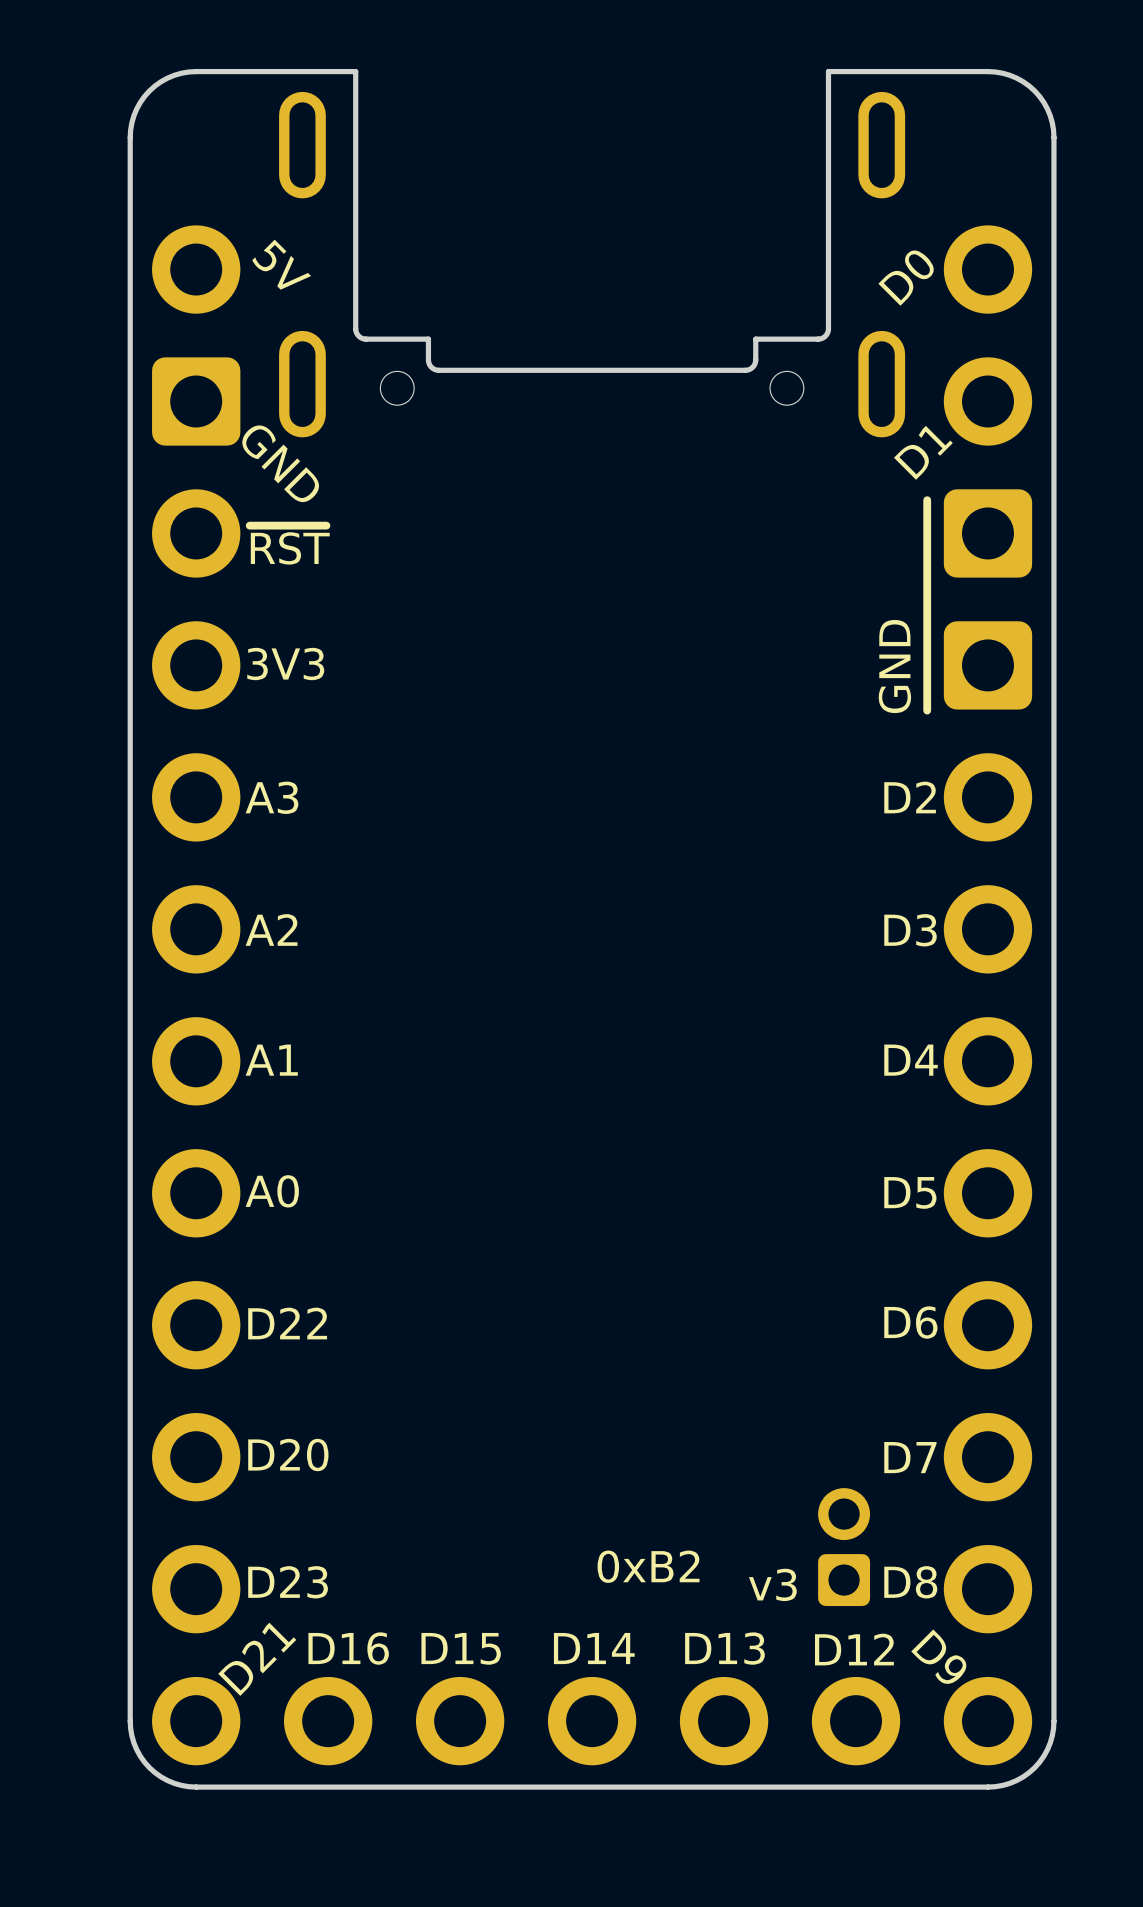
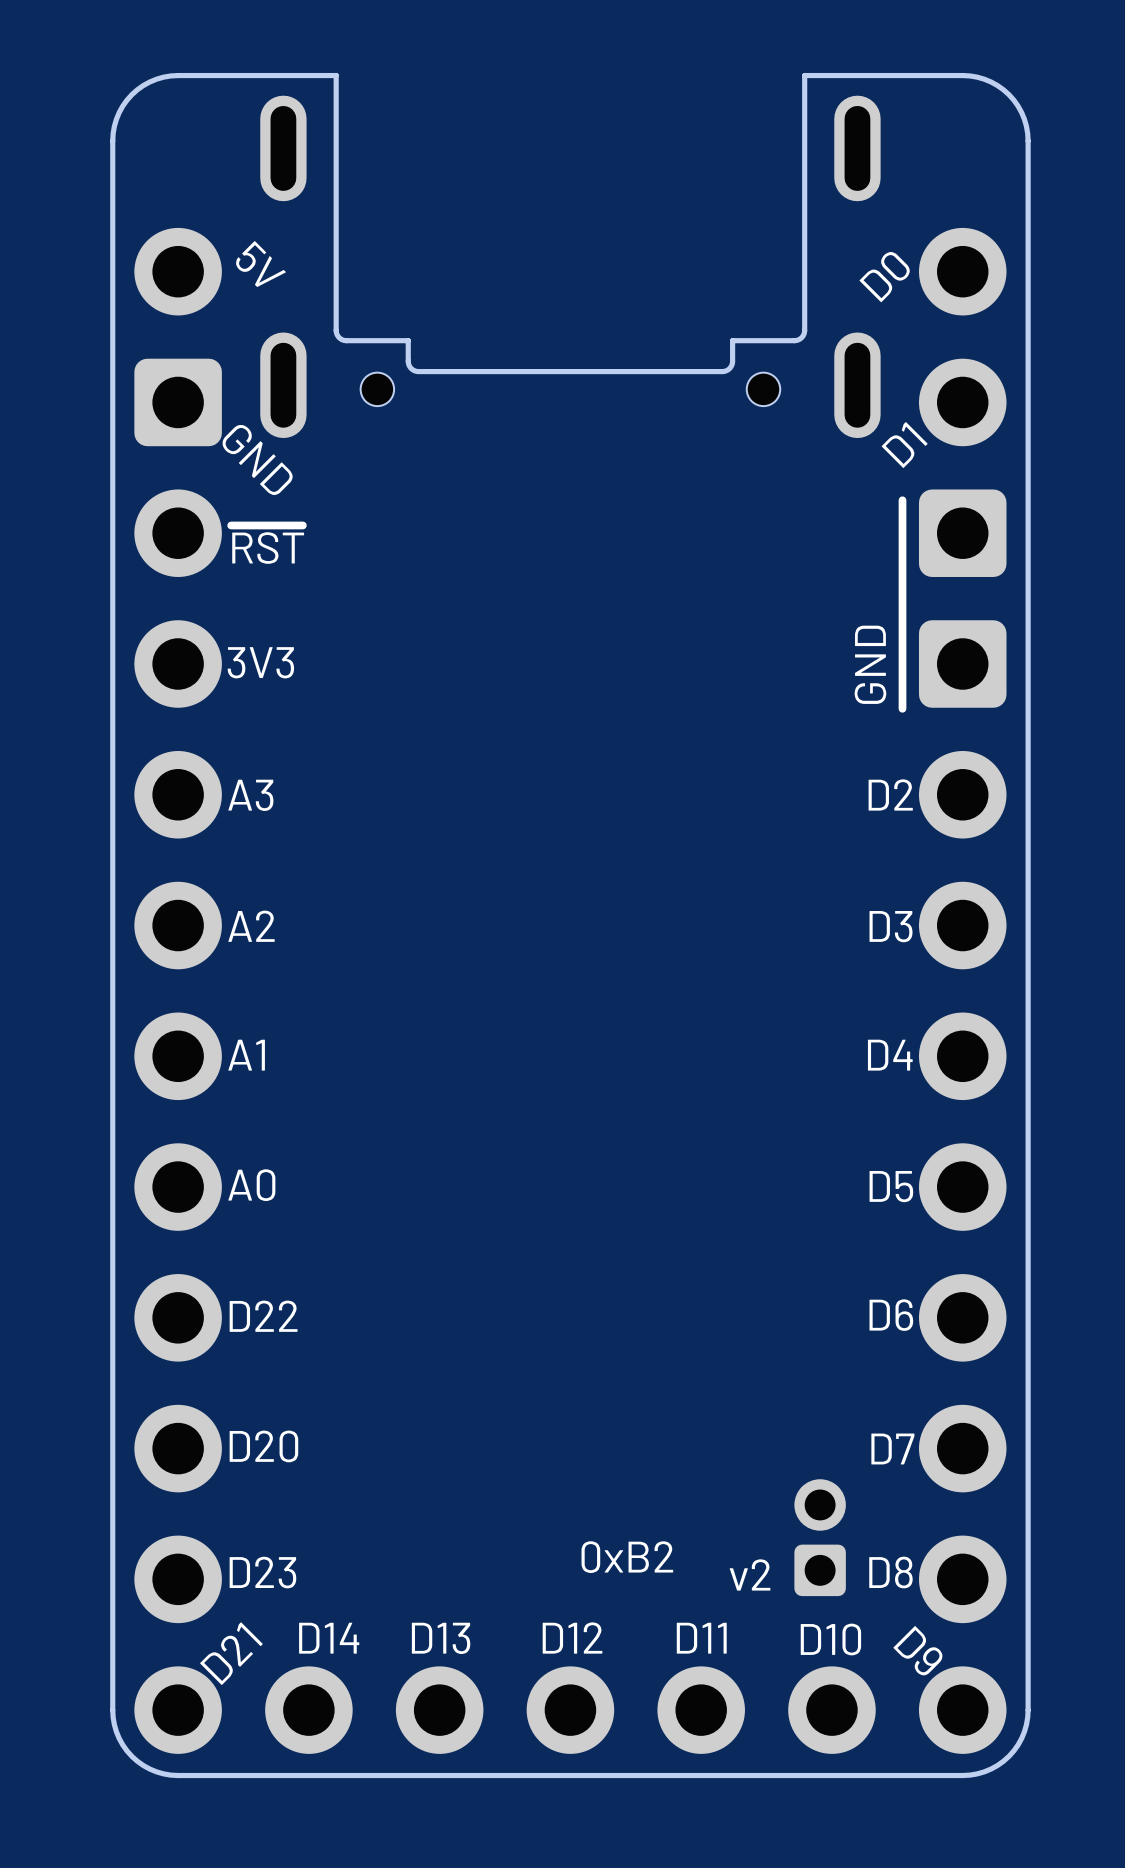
text: v3 (772, 1584) -> v2 (750, 1574)
part text: D16 (348, 1648) -> D14 (329, 1638)
part text: D15 (461, 1648) -> D13 (441, 1638)
part text: D14 (594, 1648) -> D12 (572, 1638)
part text: D13 (724, 1648) -> D11 (701, 1638)
part text: D12 (854, 1649) -> D10 (830, 1639)

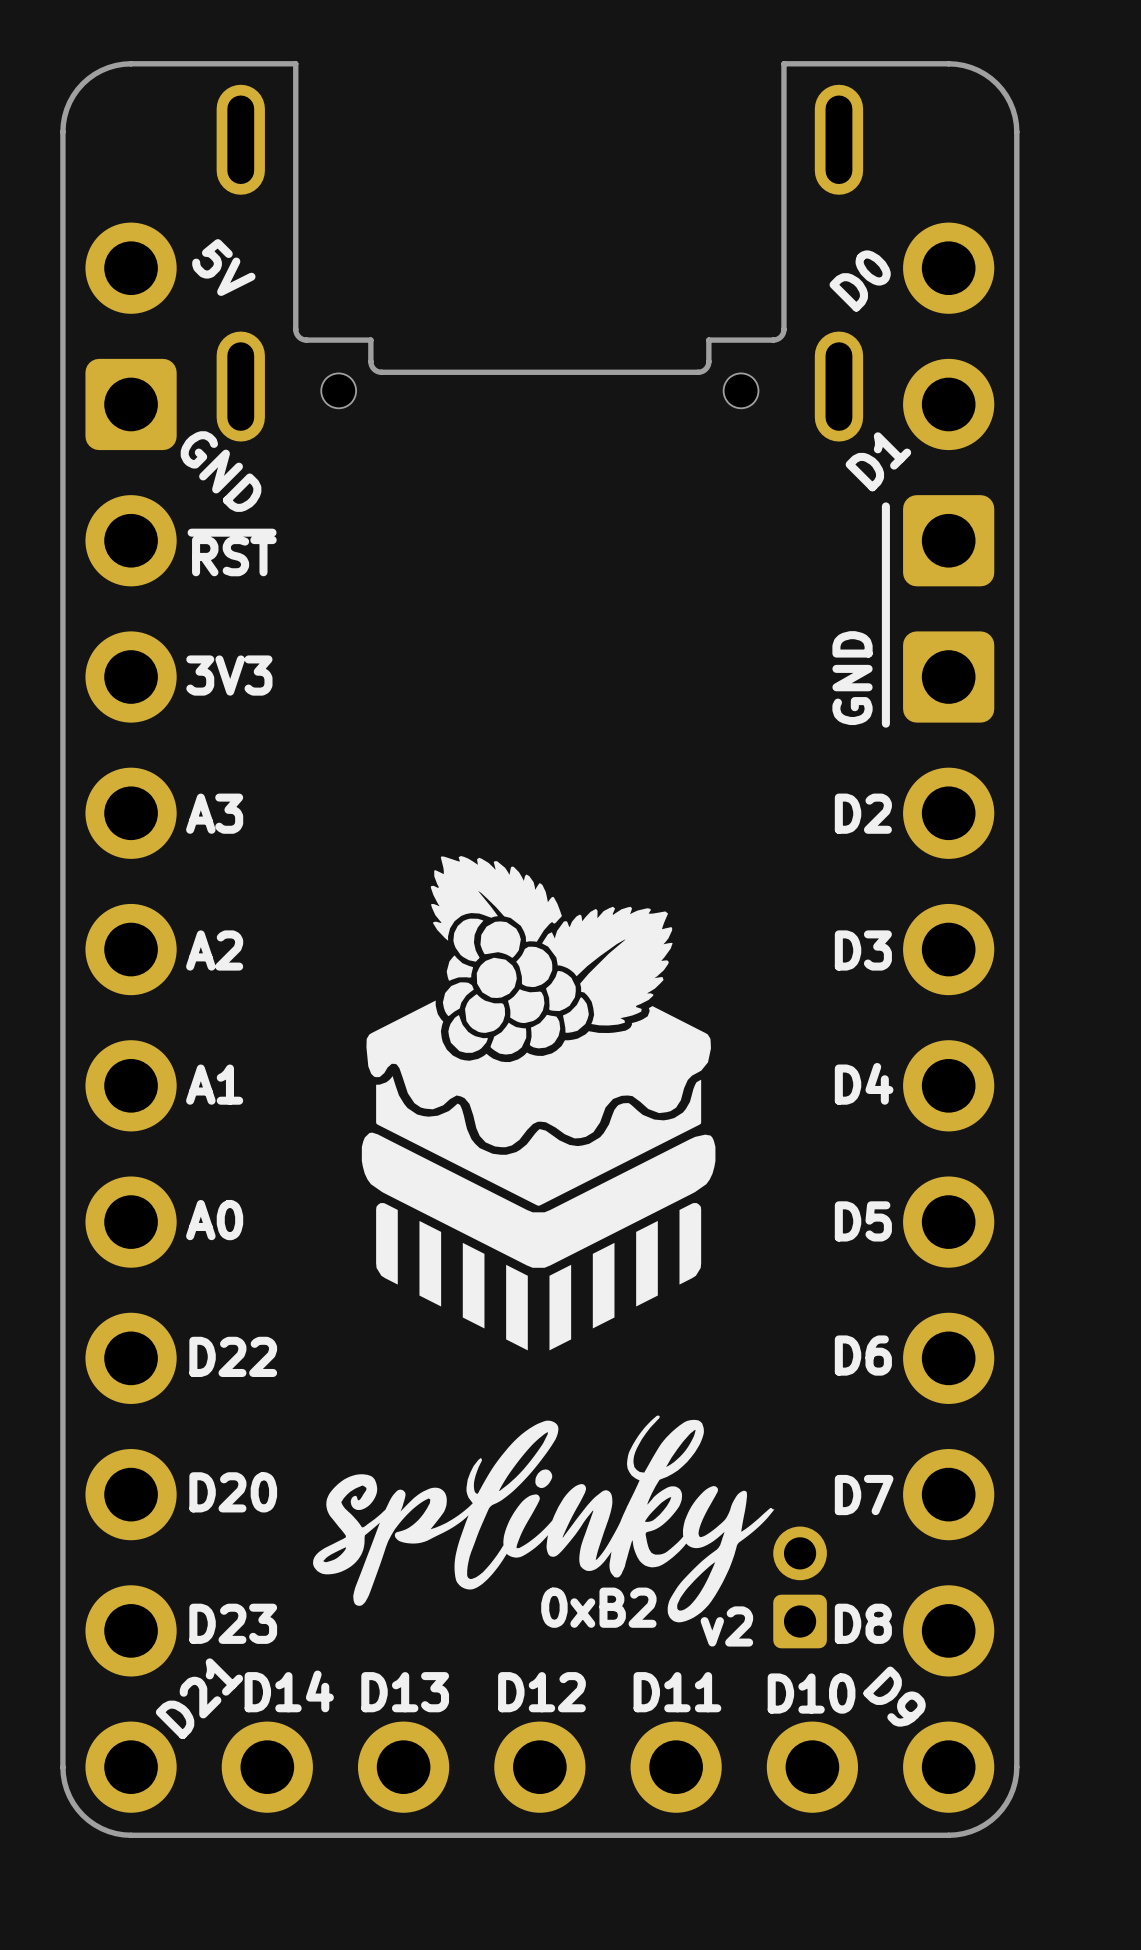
drawing: none -> [361, 856, 716, 1351]
drawing: none -> [313, 1415, 775, 1623]

